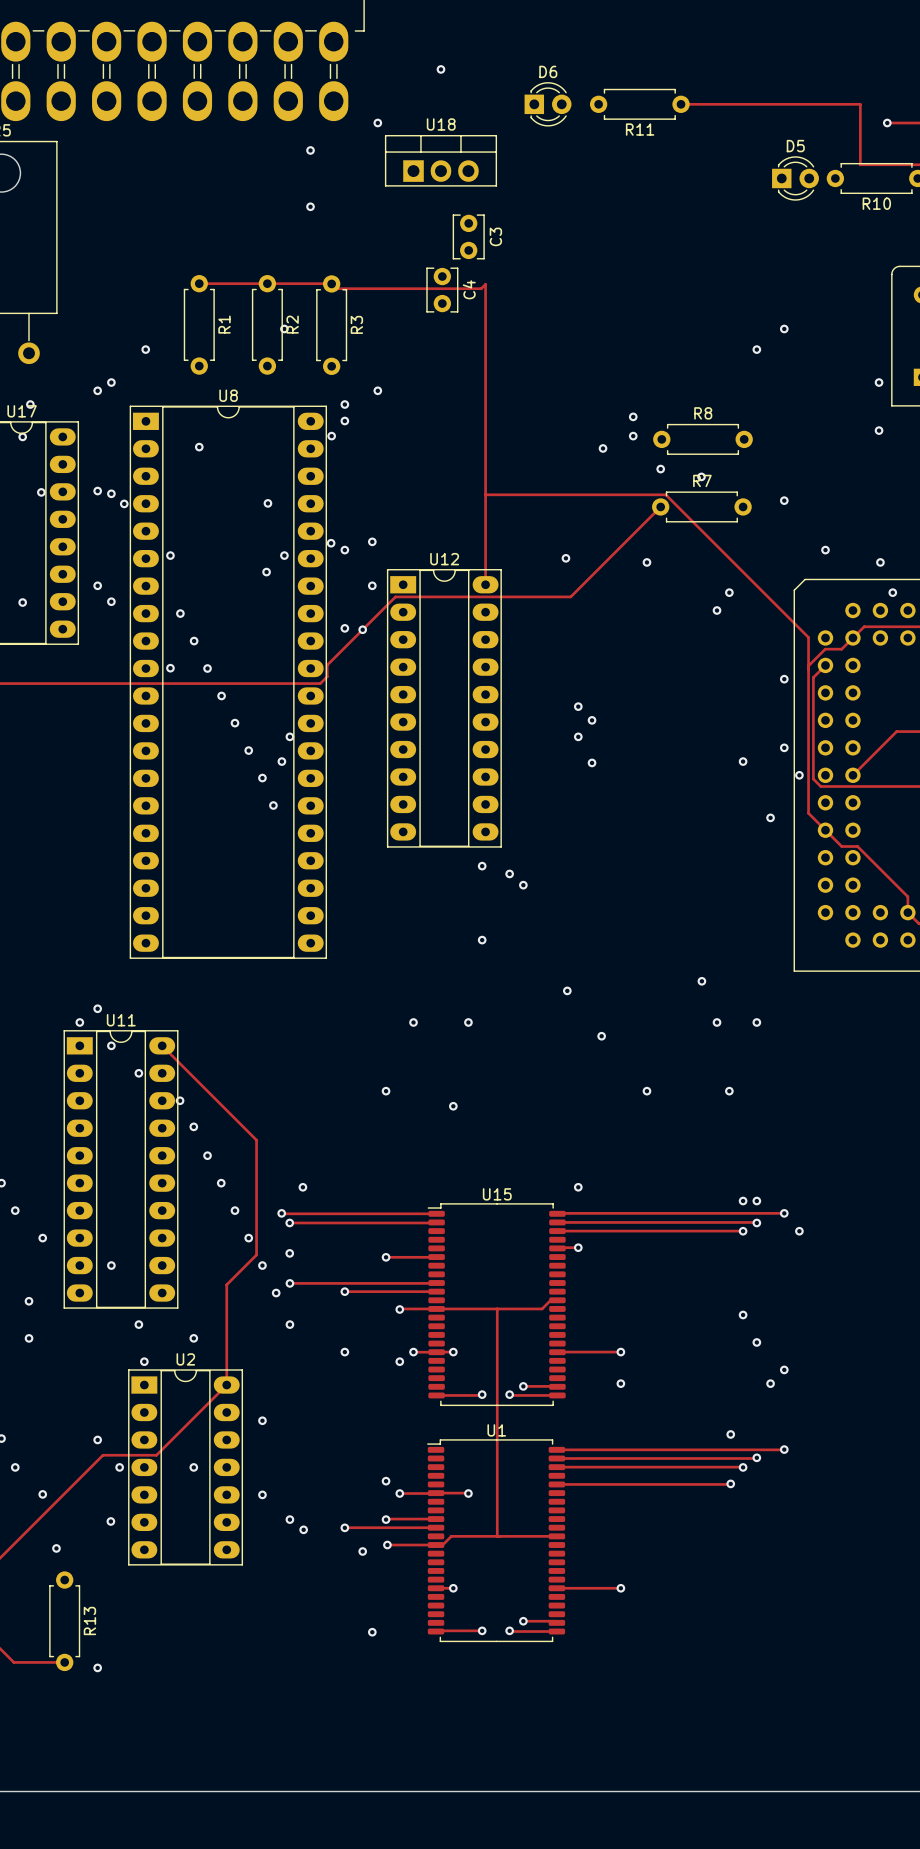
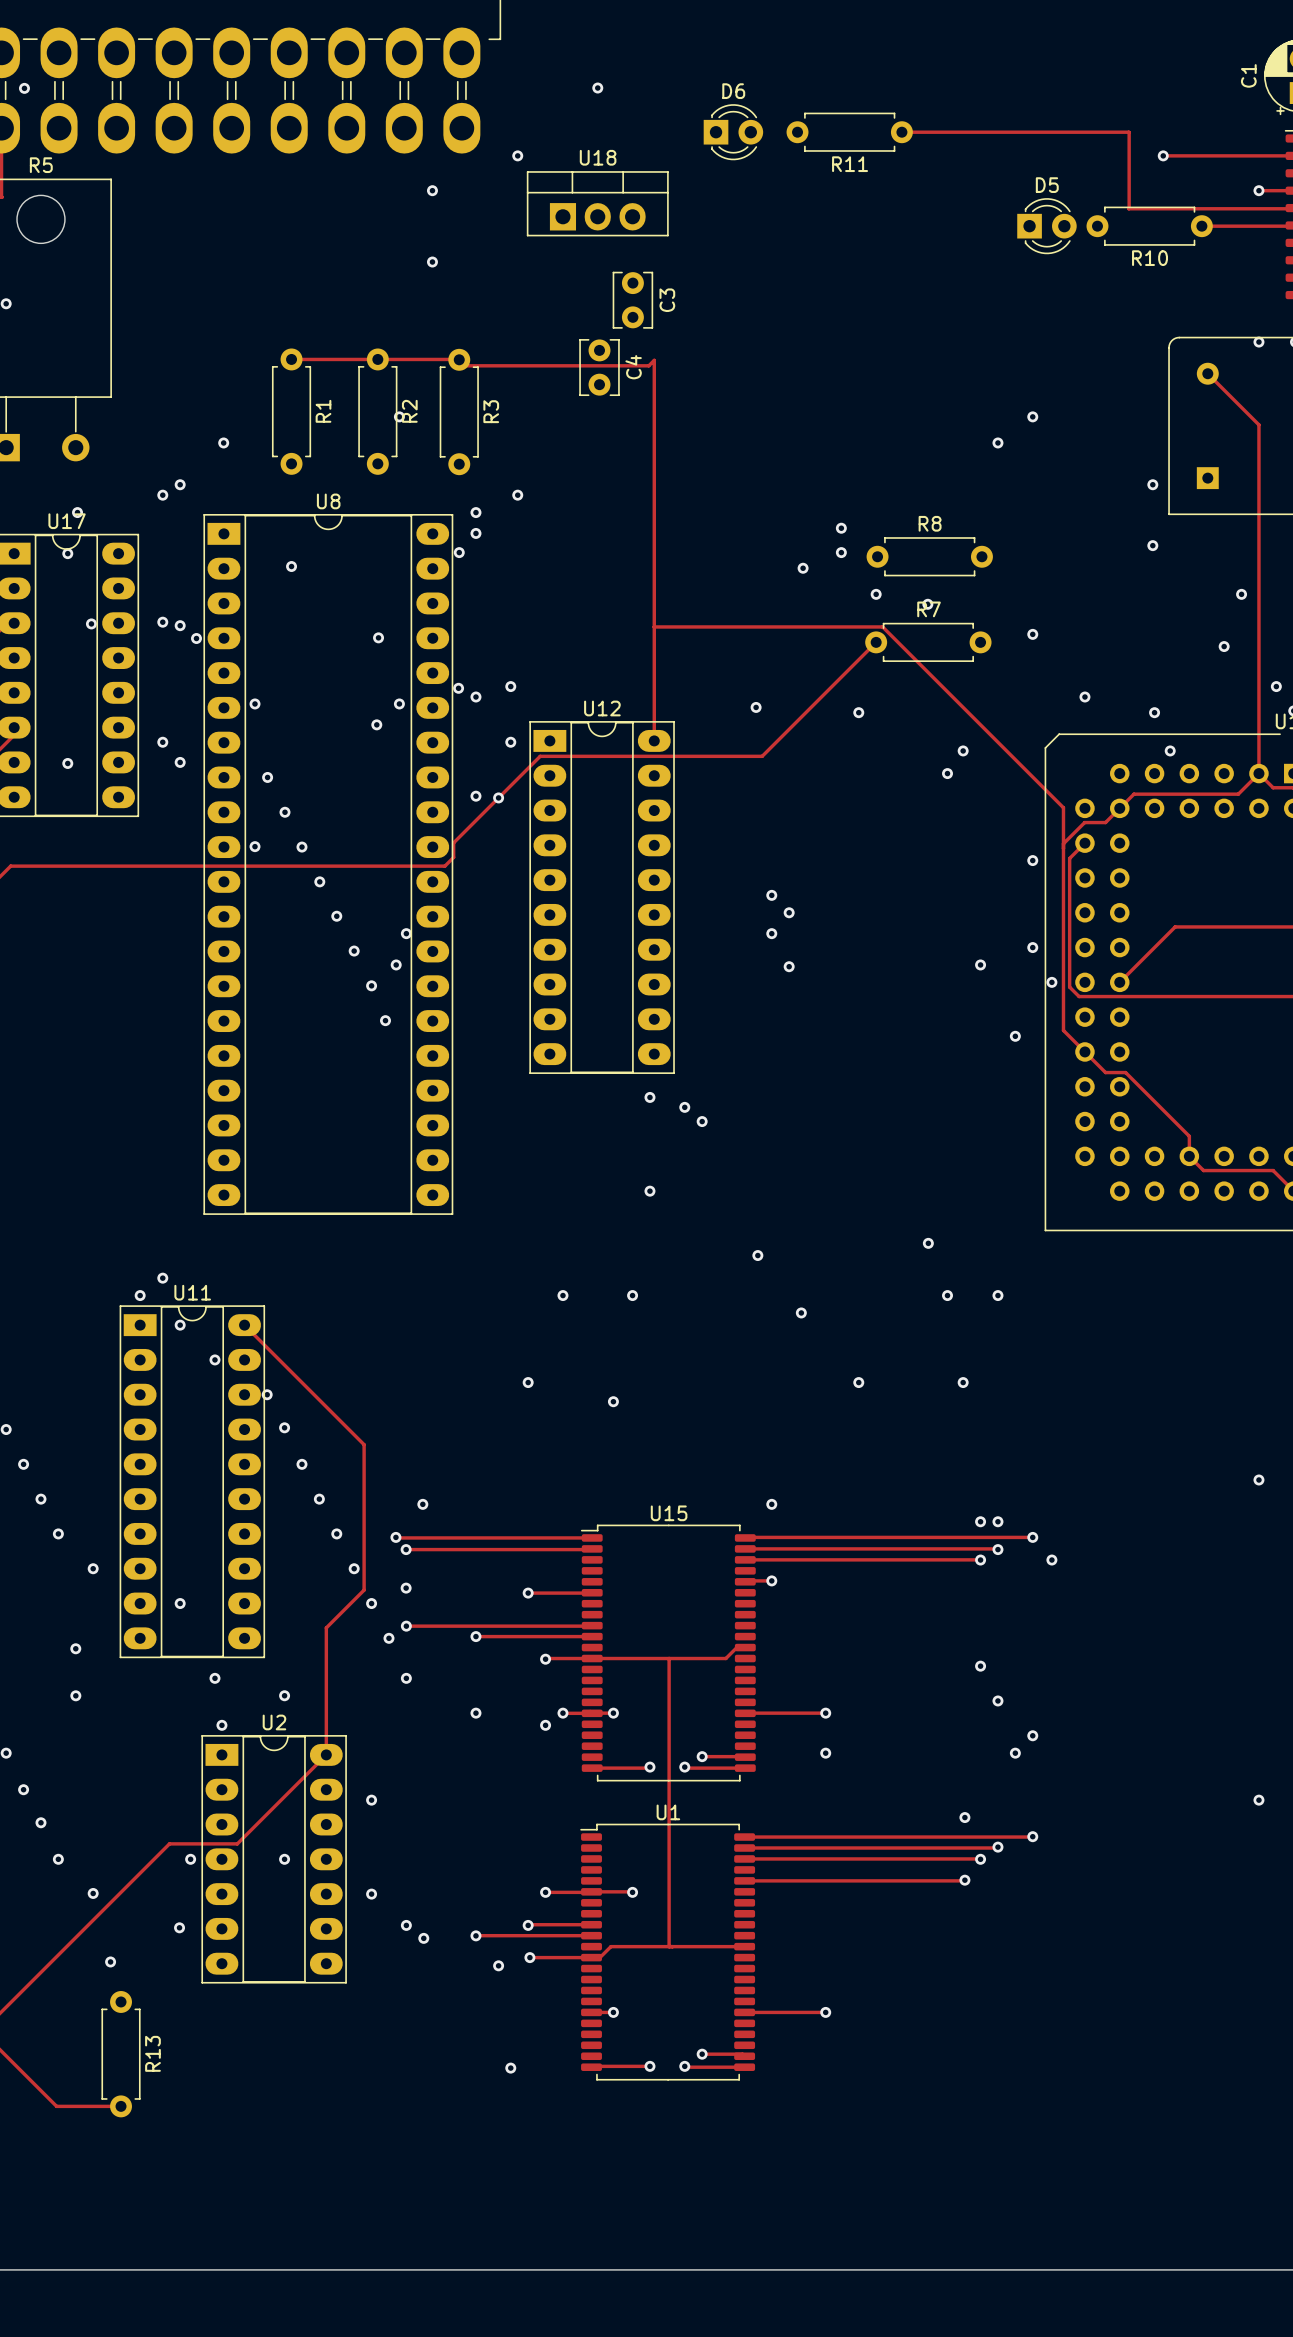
via: (97, 1439) -> none
via: (386, 1481) -> none
via: (97, 1667) -> none

